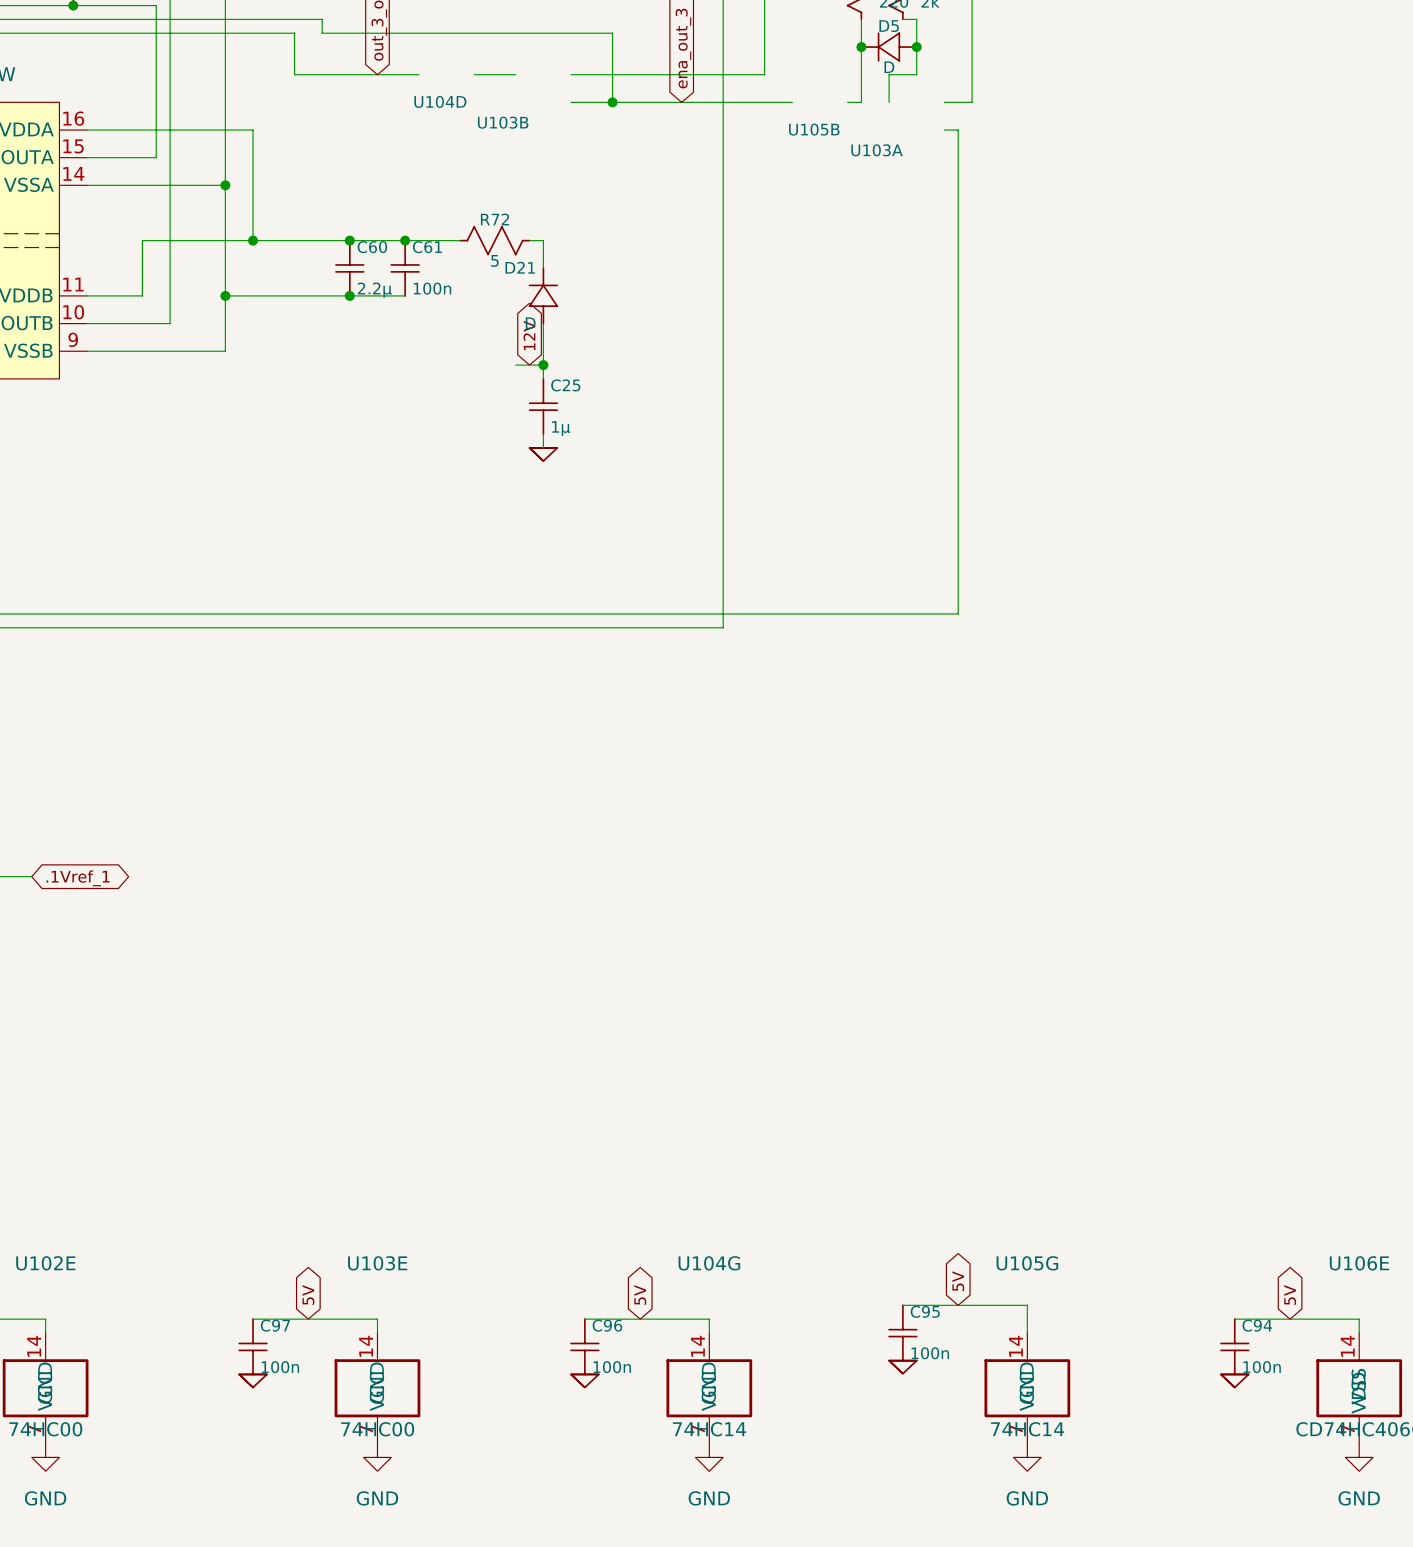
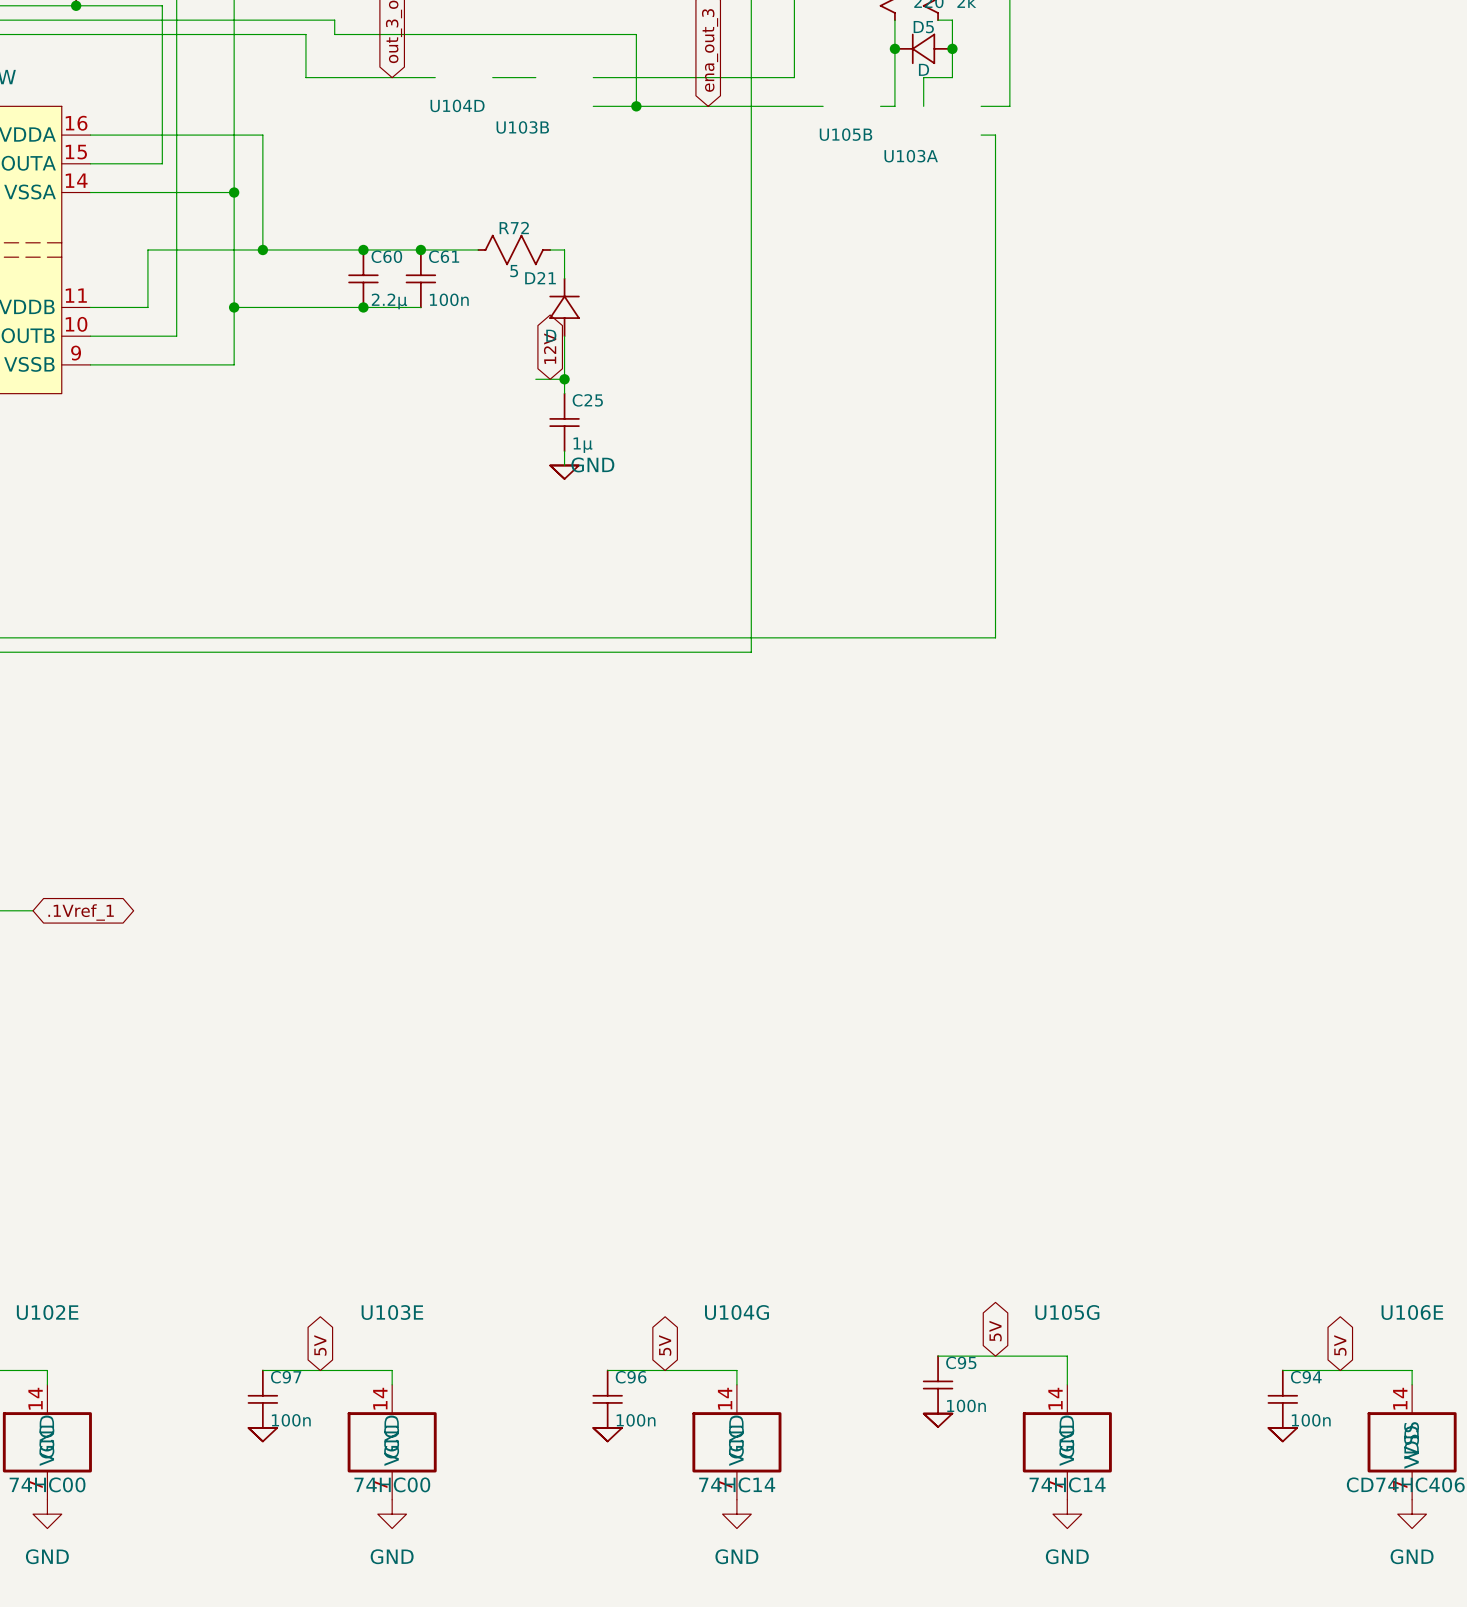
power symbol pin name: none -> GND (592, 464)

